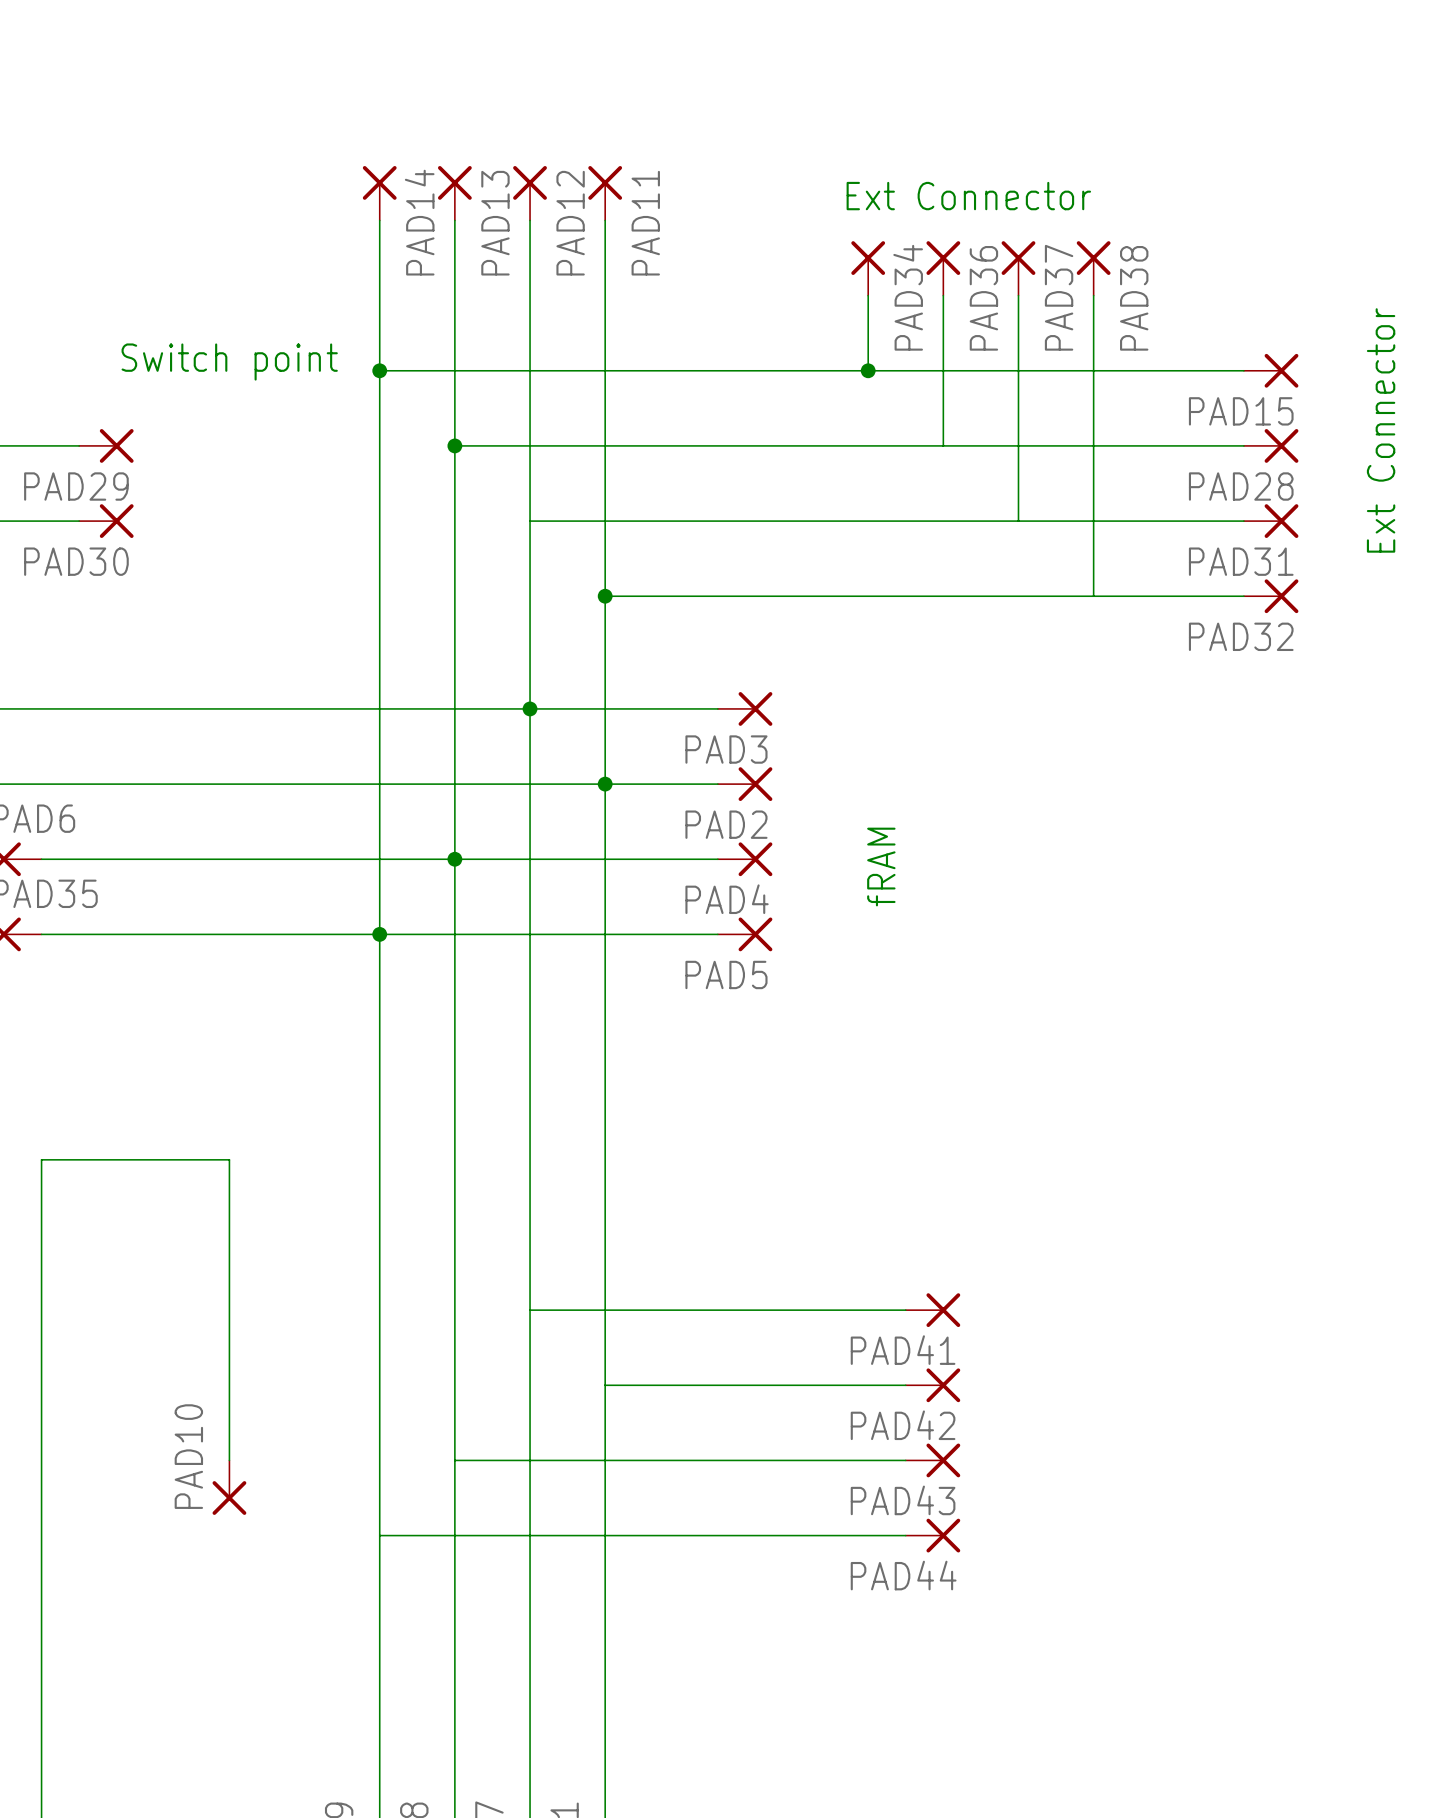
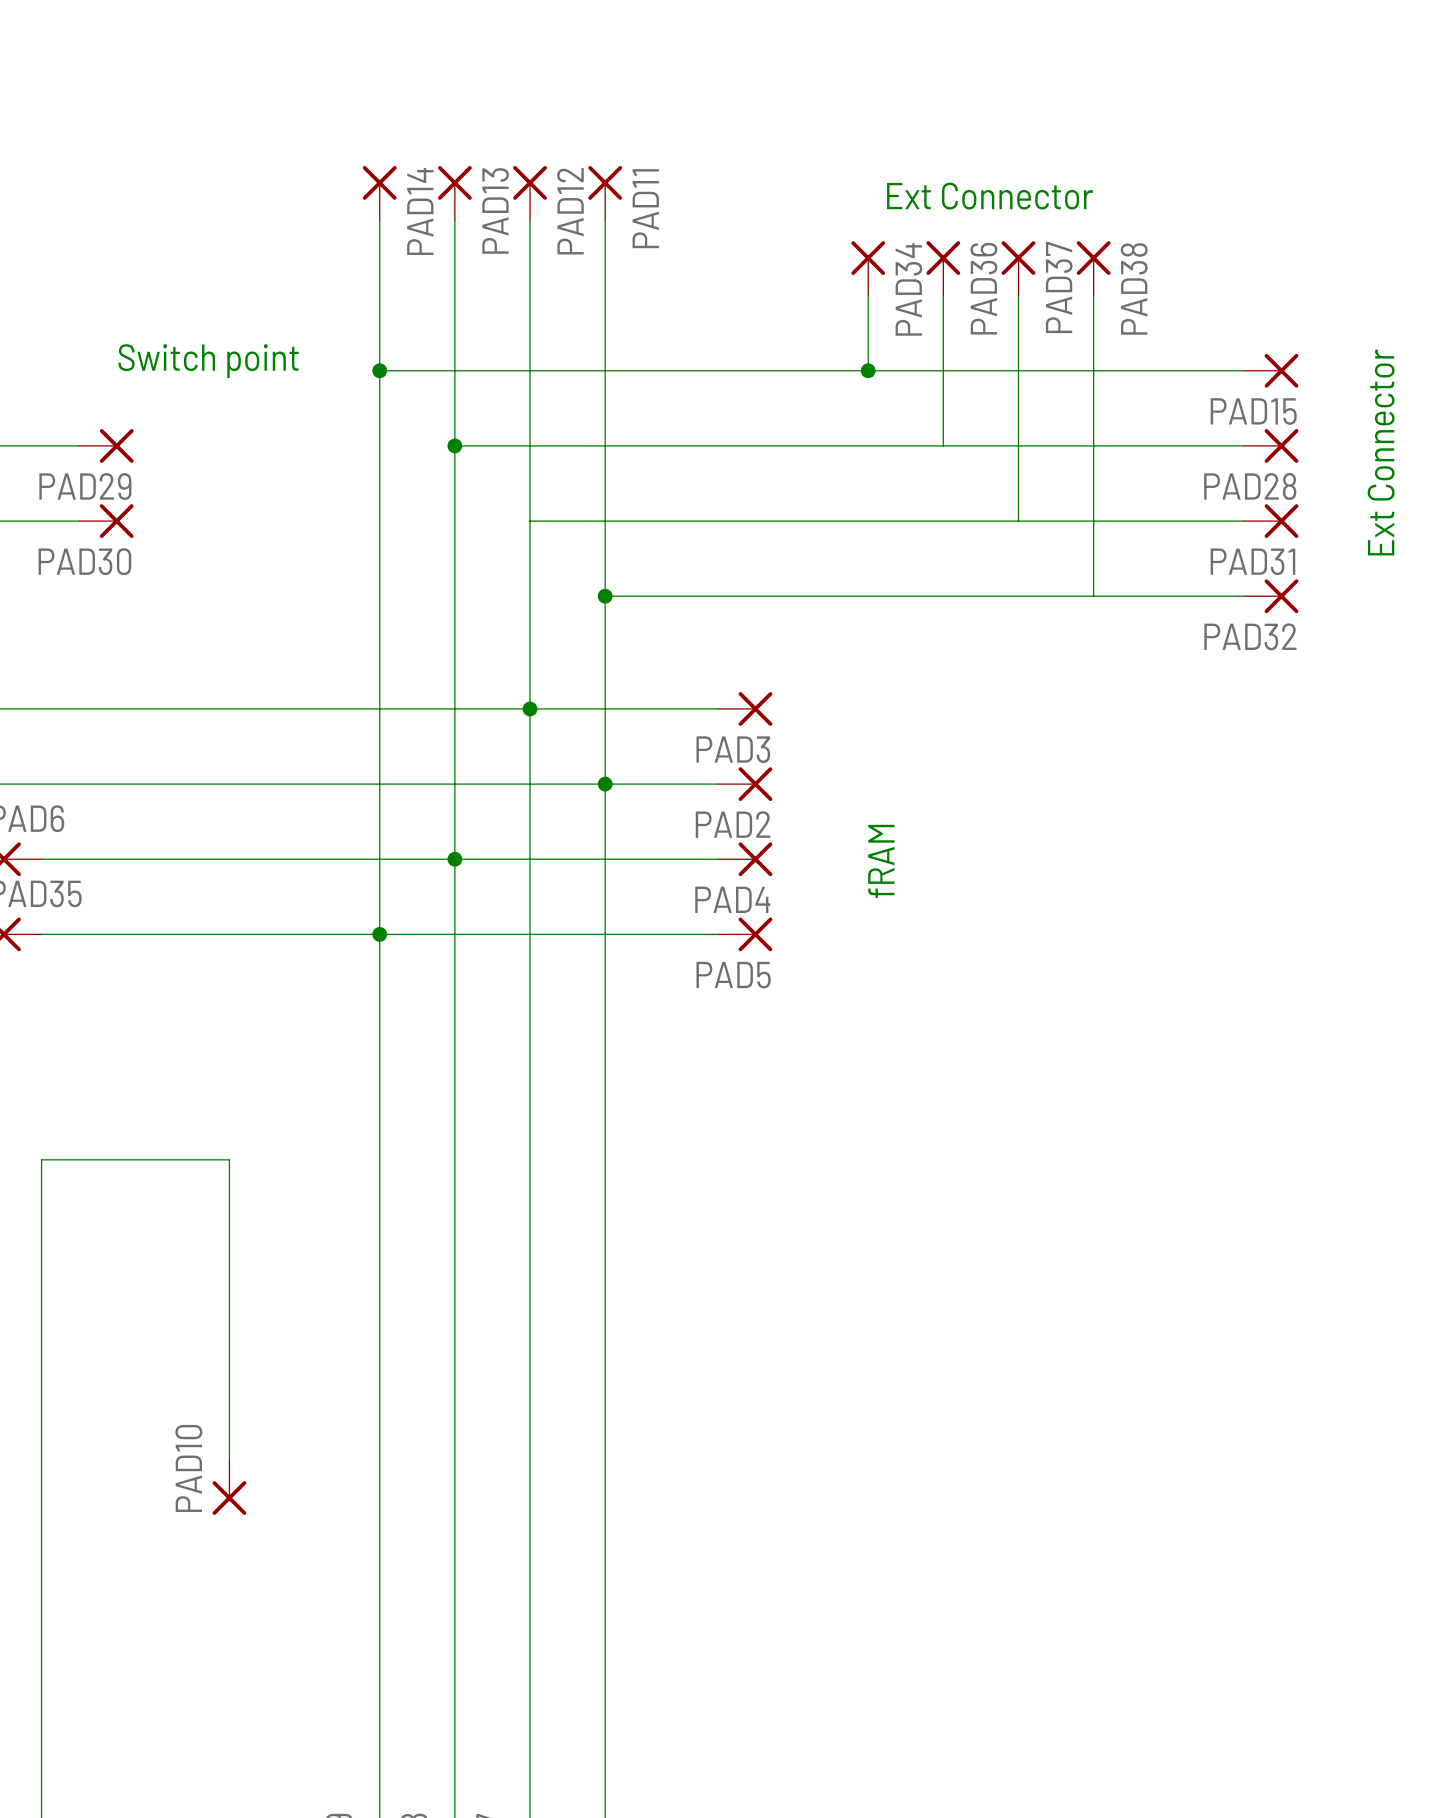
wire: (530, 1310) (905, 1310) -> none
PAD41: (933, 1310) -> none
wire: (605, 1385) (905, 1385) -> none
PAD42: (933, 1385) -> none
wire: (454, 1460) (905, 1460) -> none
PAD43: (933, 1460) -> none
wire: (379, 1535) (905, 1535) -> none
PAD44: (933, 1535) -> none

